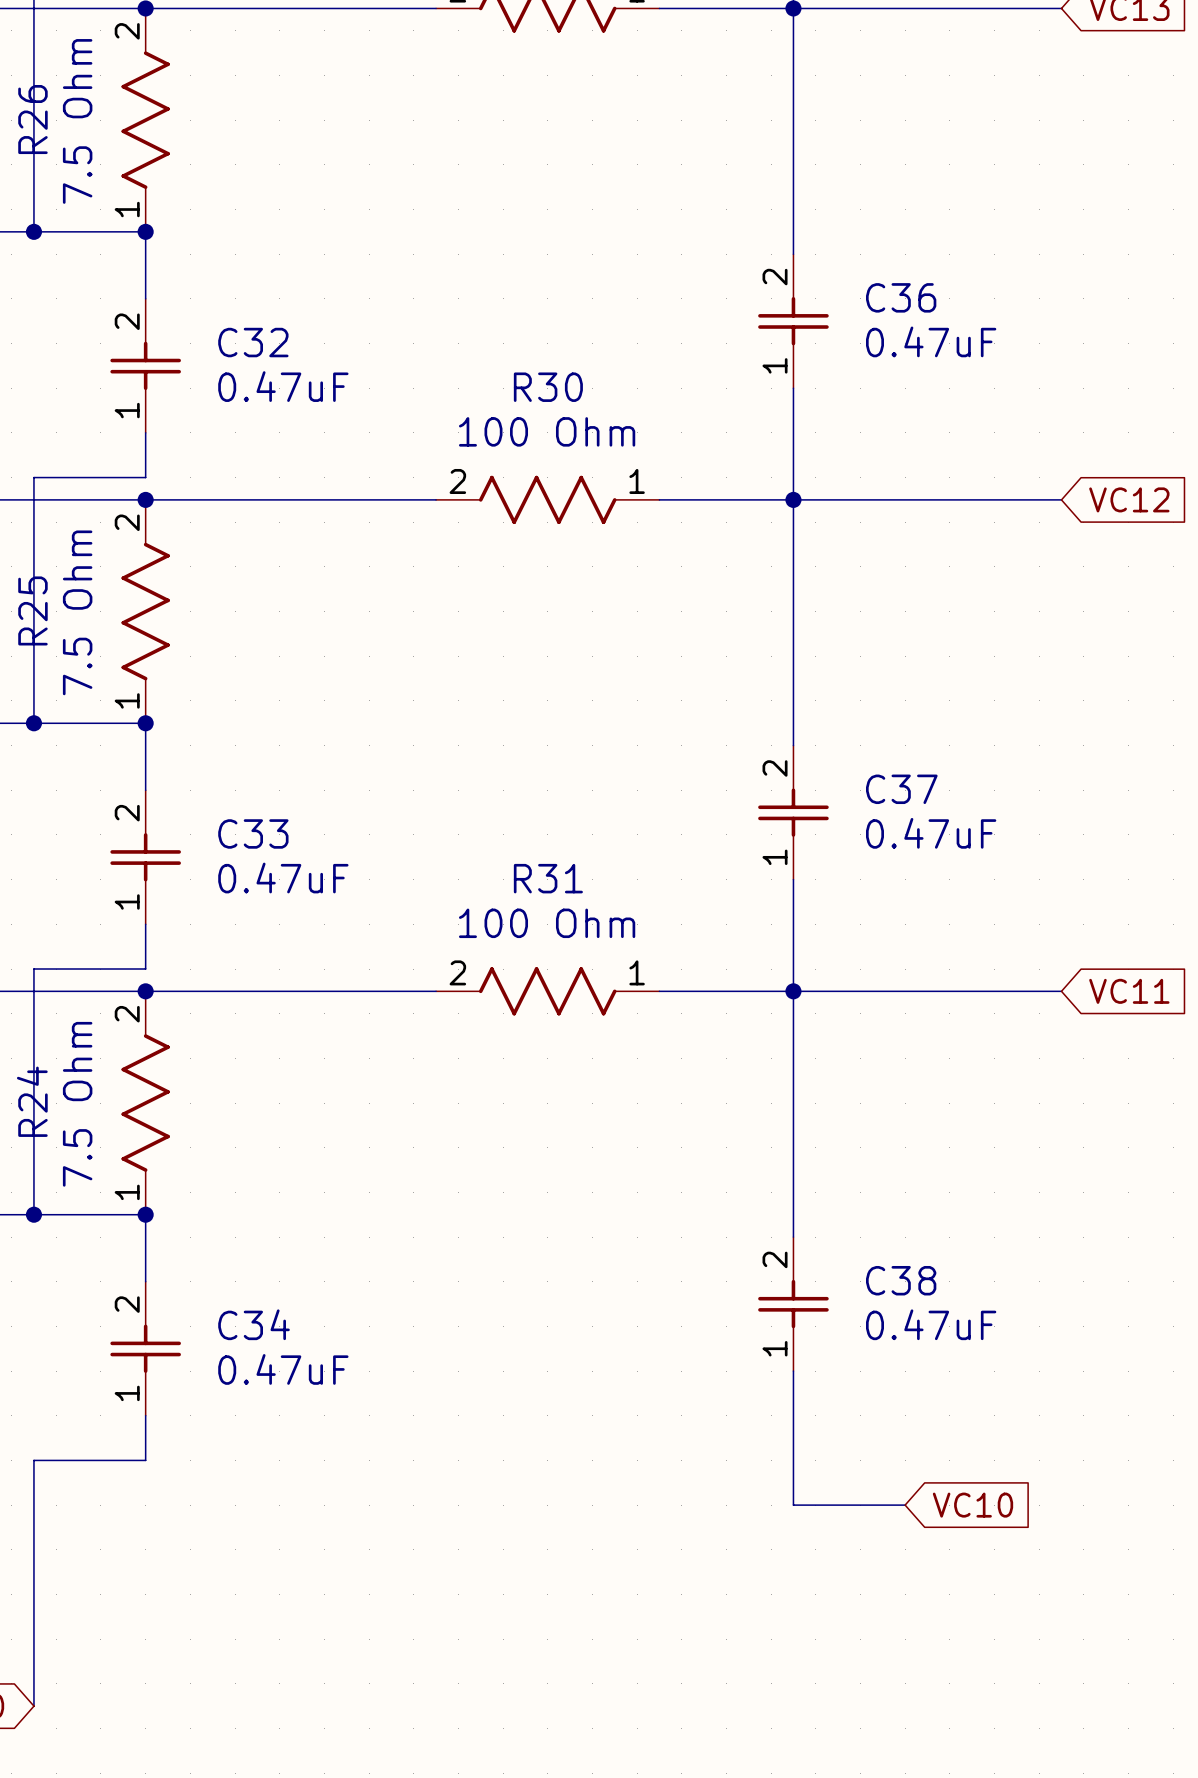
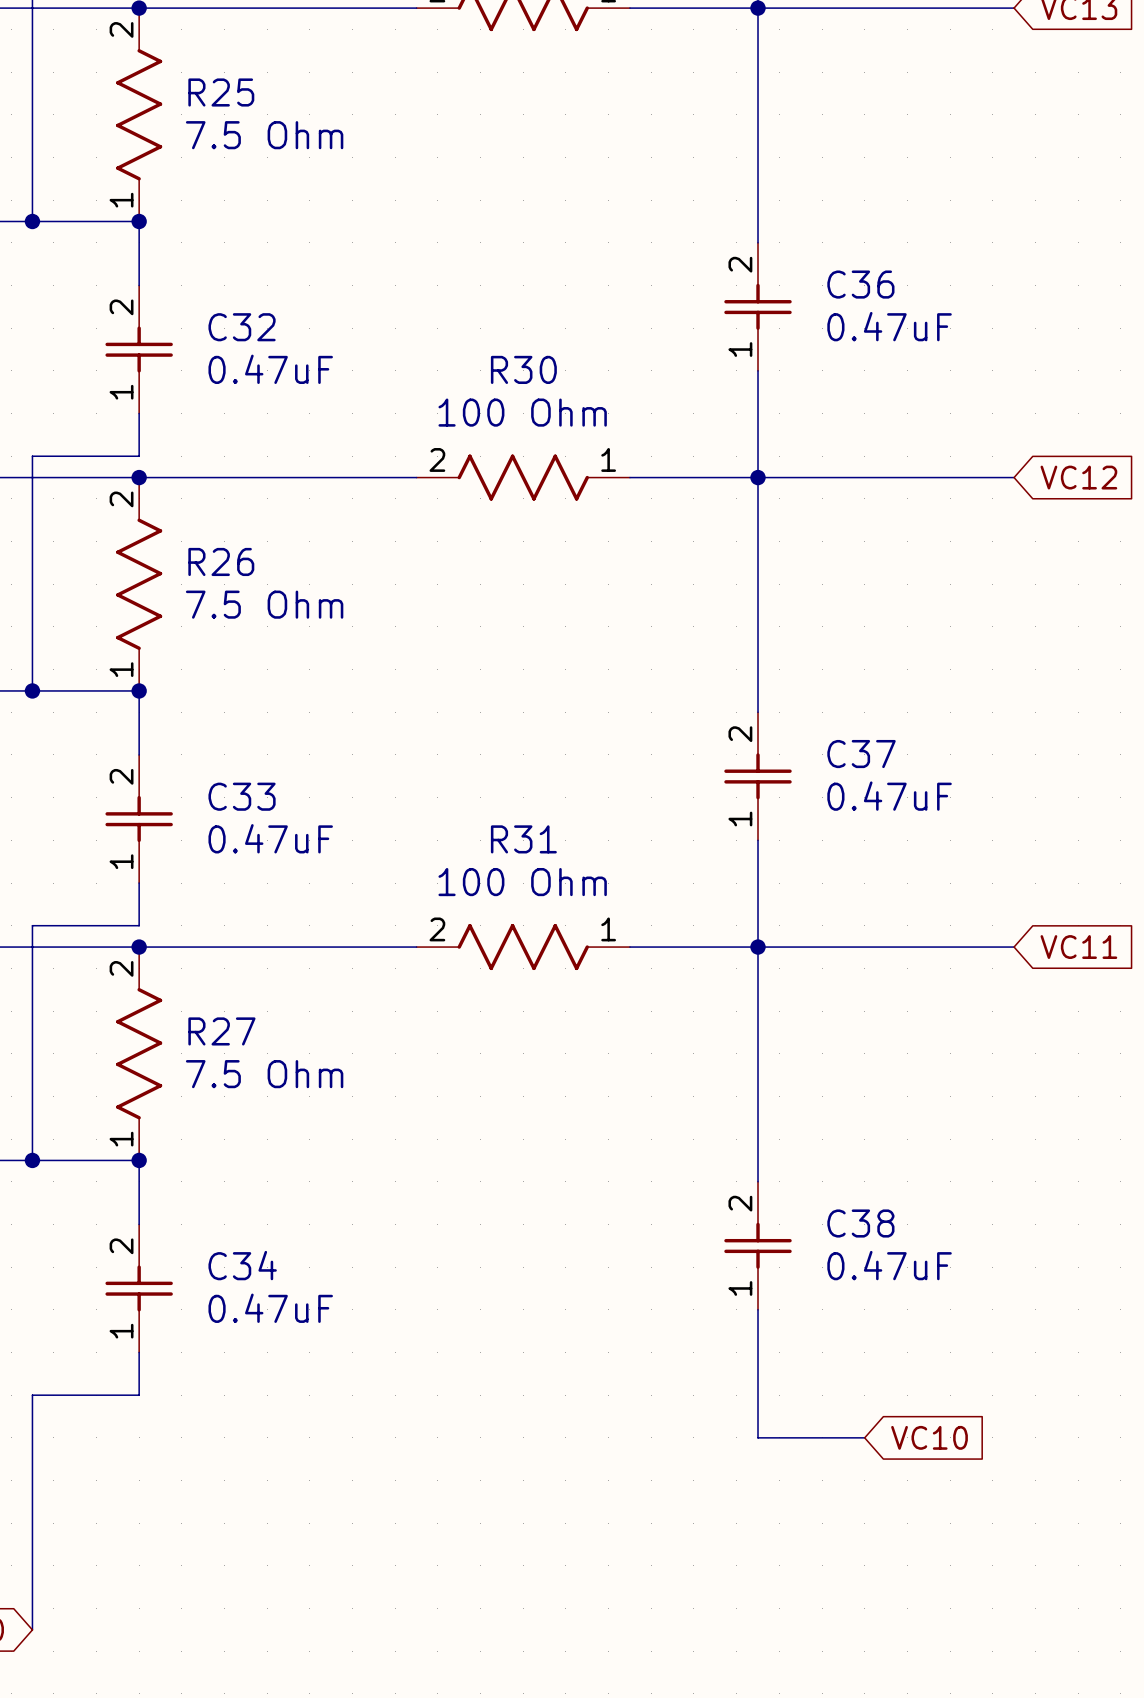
R26 name: R26 (32, 119) -> R25 (221, 92)
R26 value rotation: 0° (77, 121) -> 90° clockwise (264, 135)
R26 value position: 7.5 Ohm (77, 121) -> 7.5 Ohm (264, 135)
R25 name: R25 (32, 610) -> R26 (221, 561)
R25 value rotation: 0° (77, 612) -> 90° clockwise (264, 604)
R25 value position: 7.5 Ohm (77, 612) -> 7.5 Ohm (264, 604)
R24 name: R24 (32, 1101) -> R27 (221, 1031)
R24 value rotation: 0° (77, 1104) -> 90° clockwise (264, 1074)
R24 value position: 7.5 Ohm (77, 1104) -> 7.5 Ohm (264, 1074)

